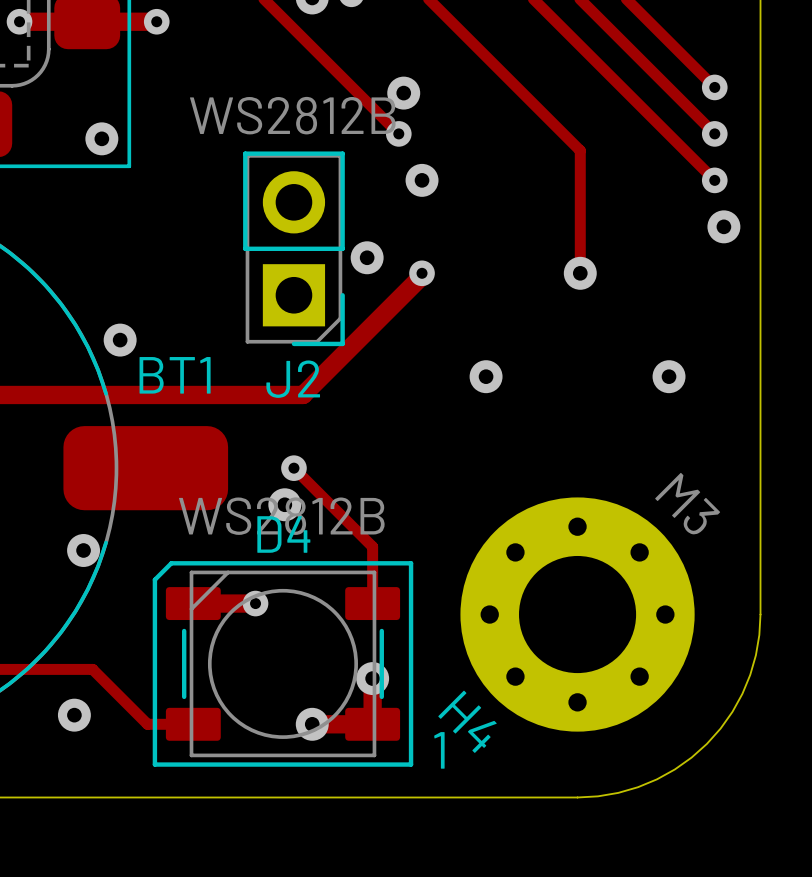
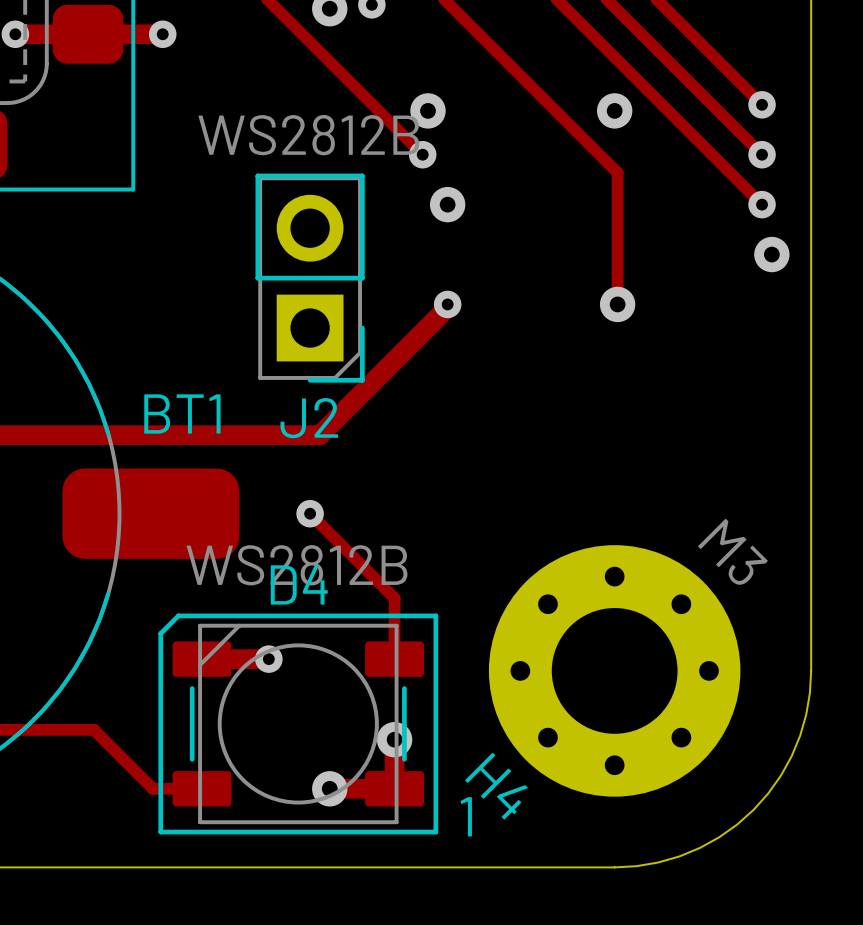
via: none -> (614, 110)
via: (101, 138) -> none
via: (367, 257) -> none
via: (120, 340) -> none
via: (486, 376) -> none
via: (669, 376) -> none
via: (284, 504) -> none
via: (83, 550) -> none
via: (74, 715) -> none

